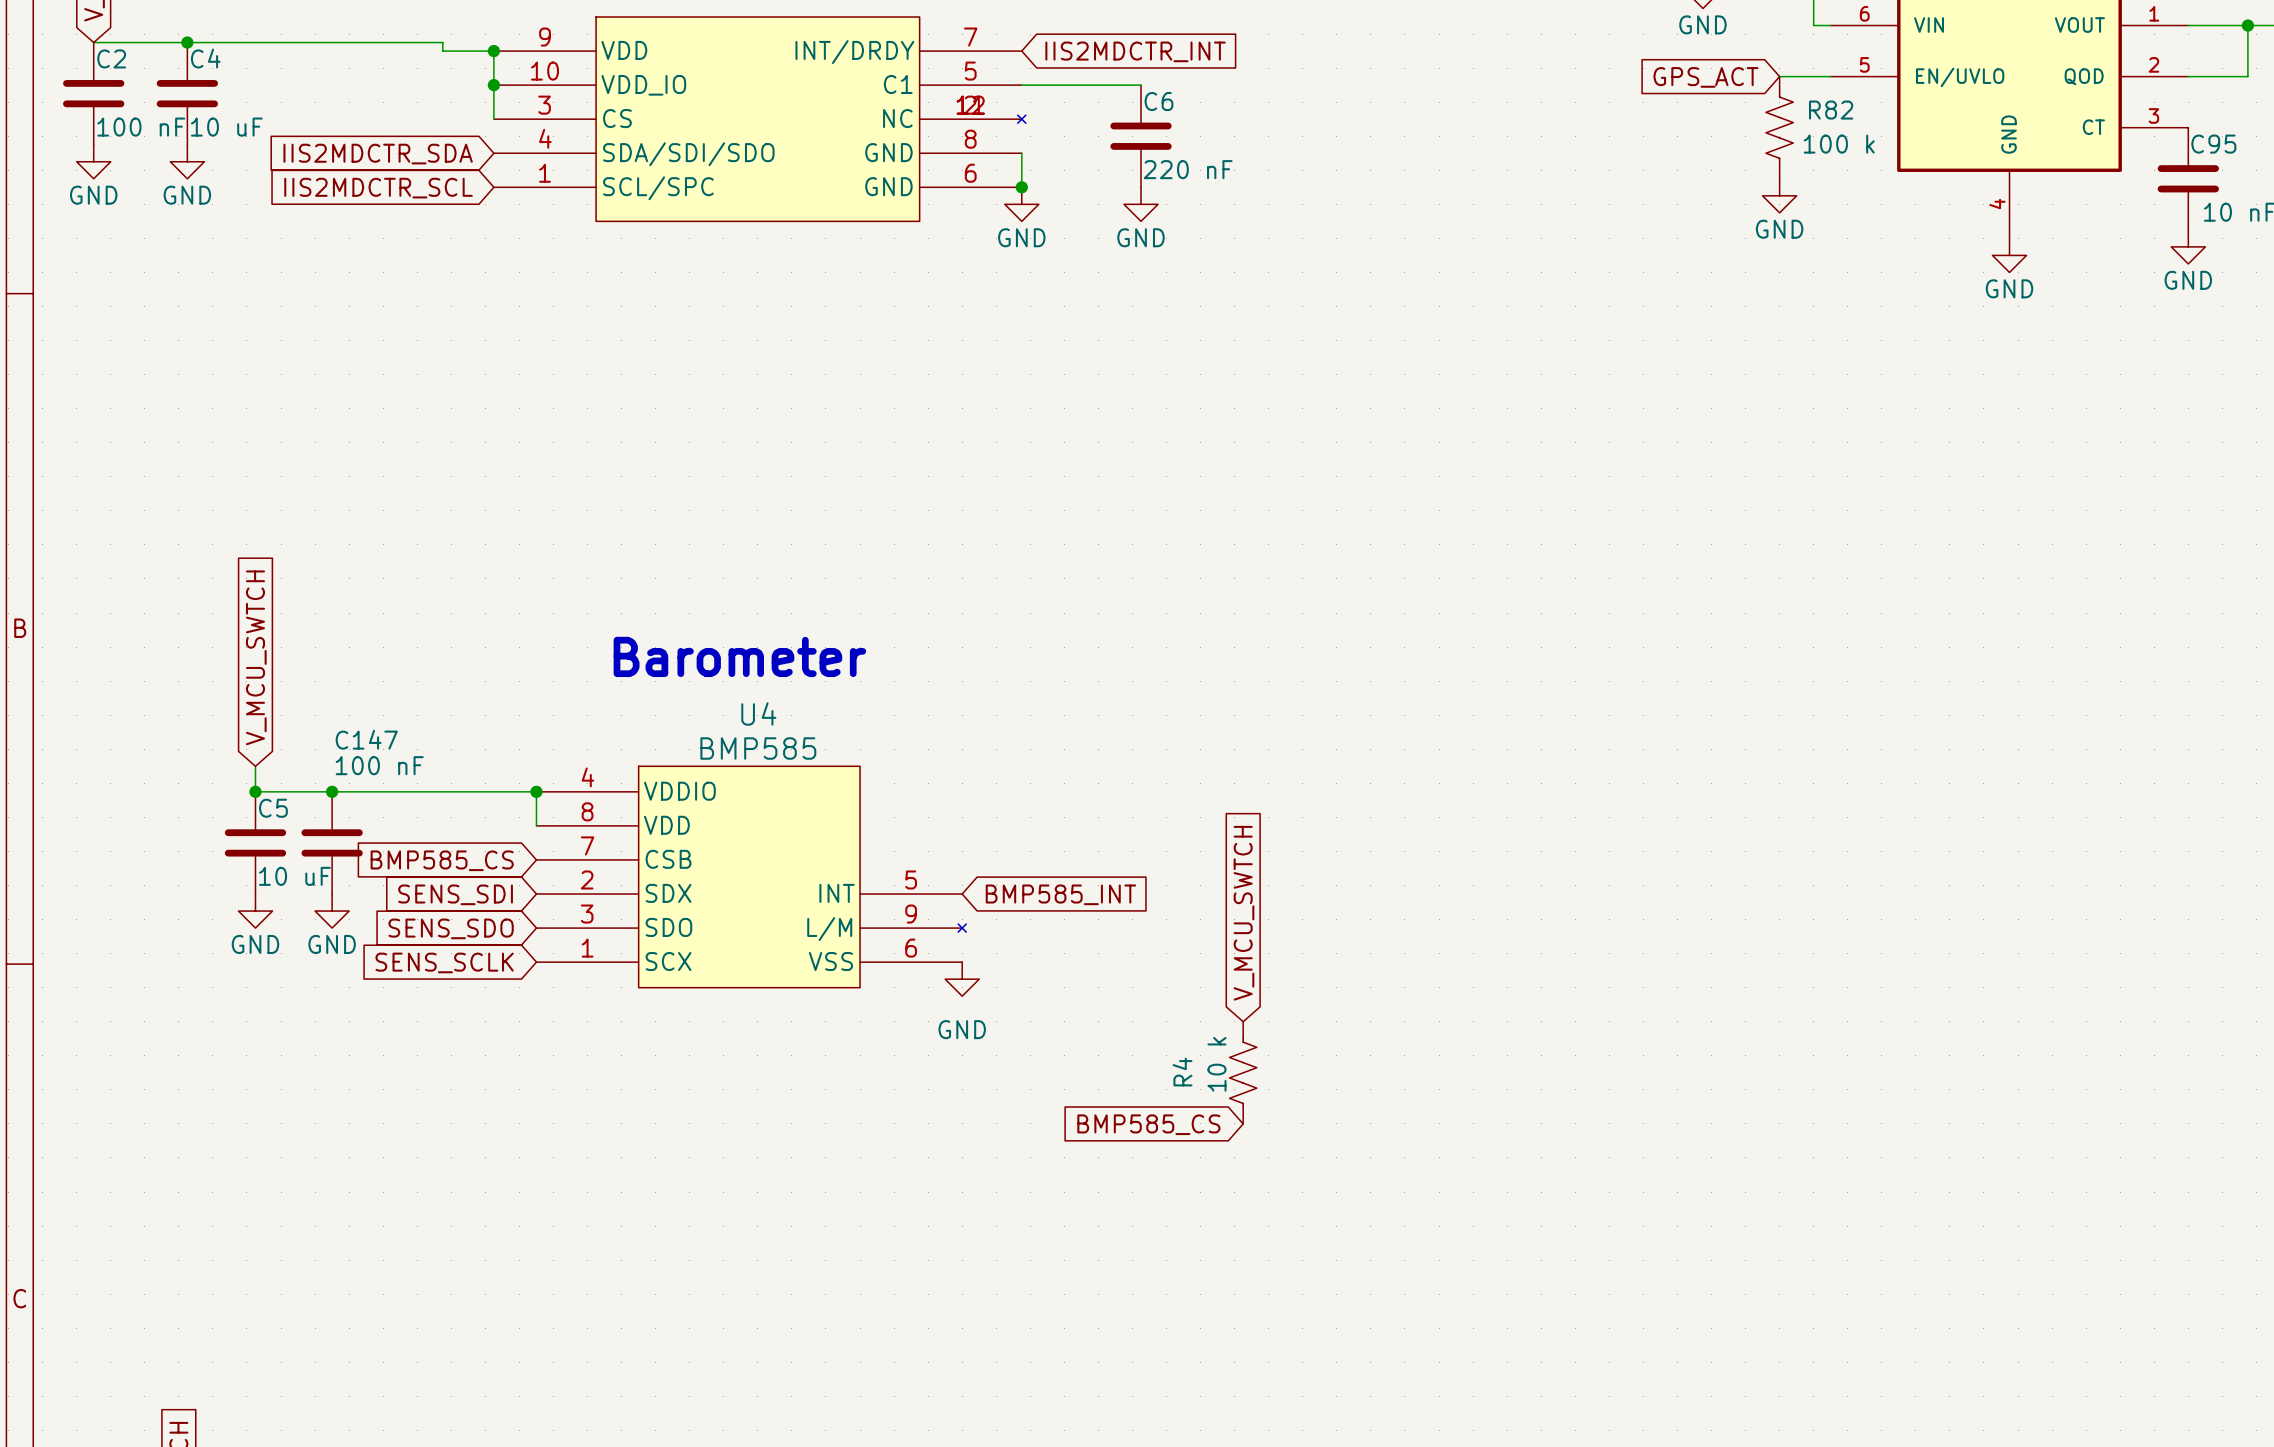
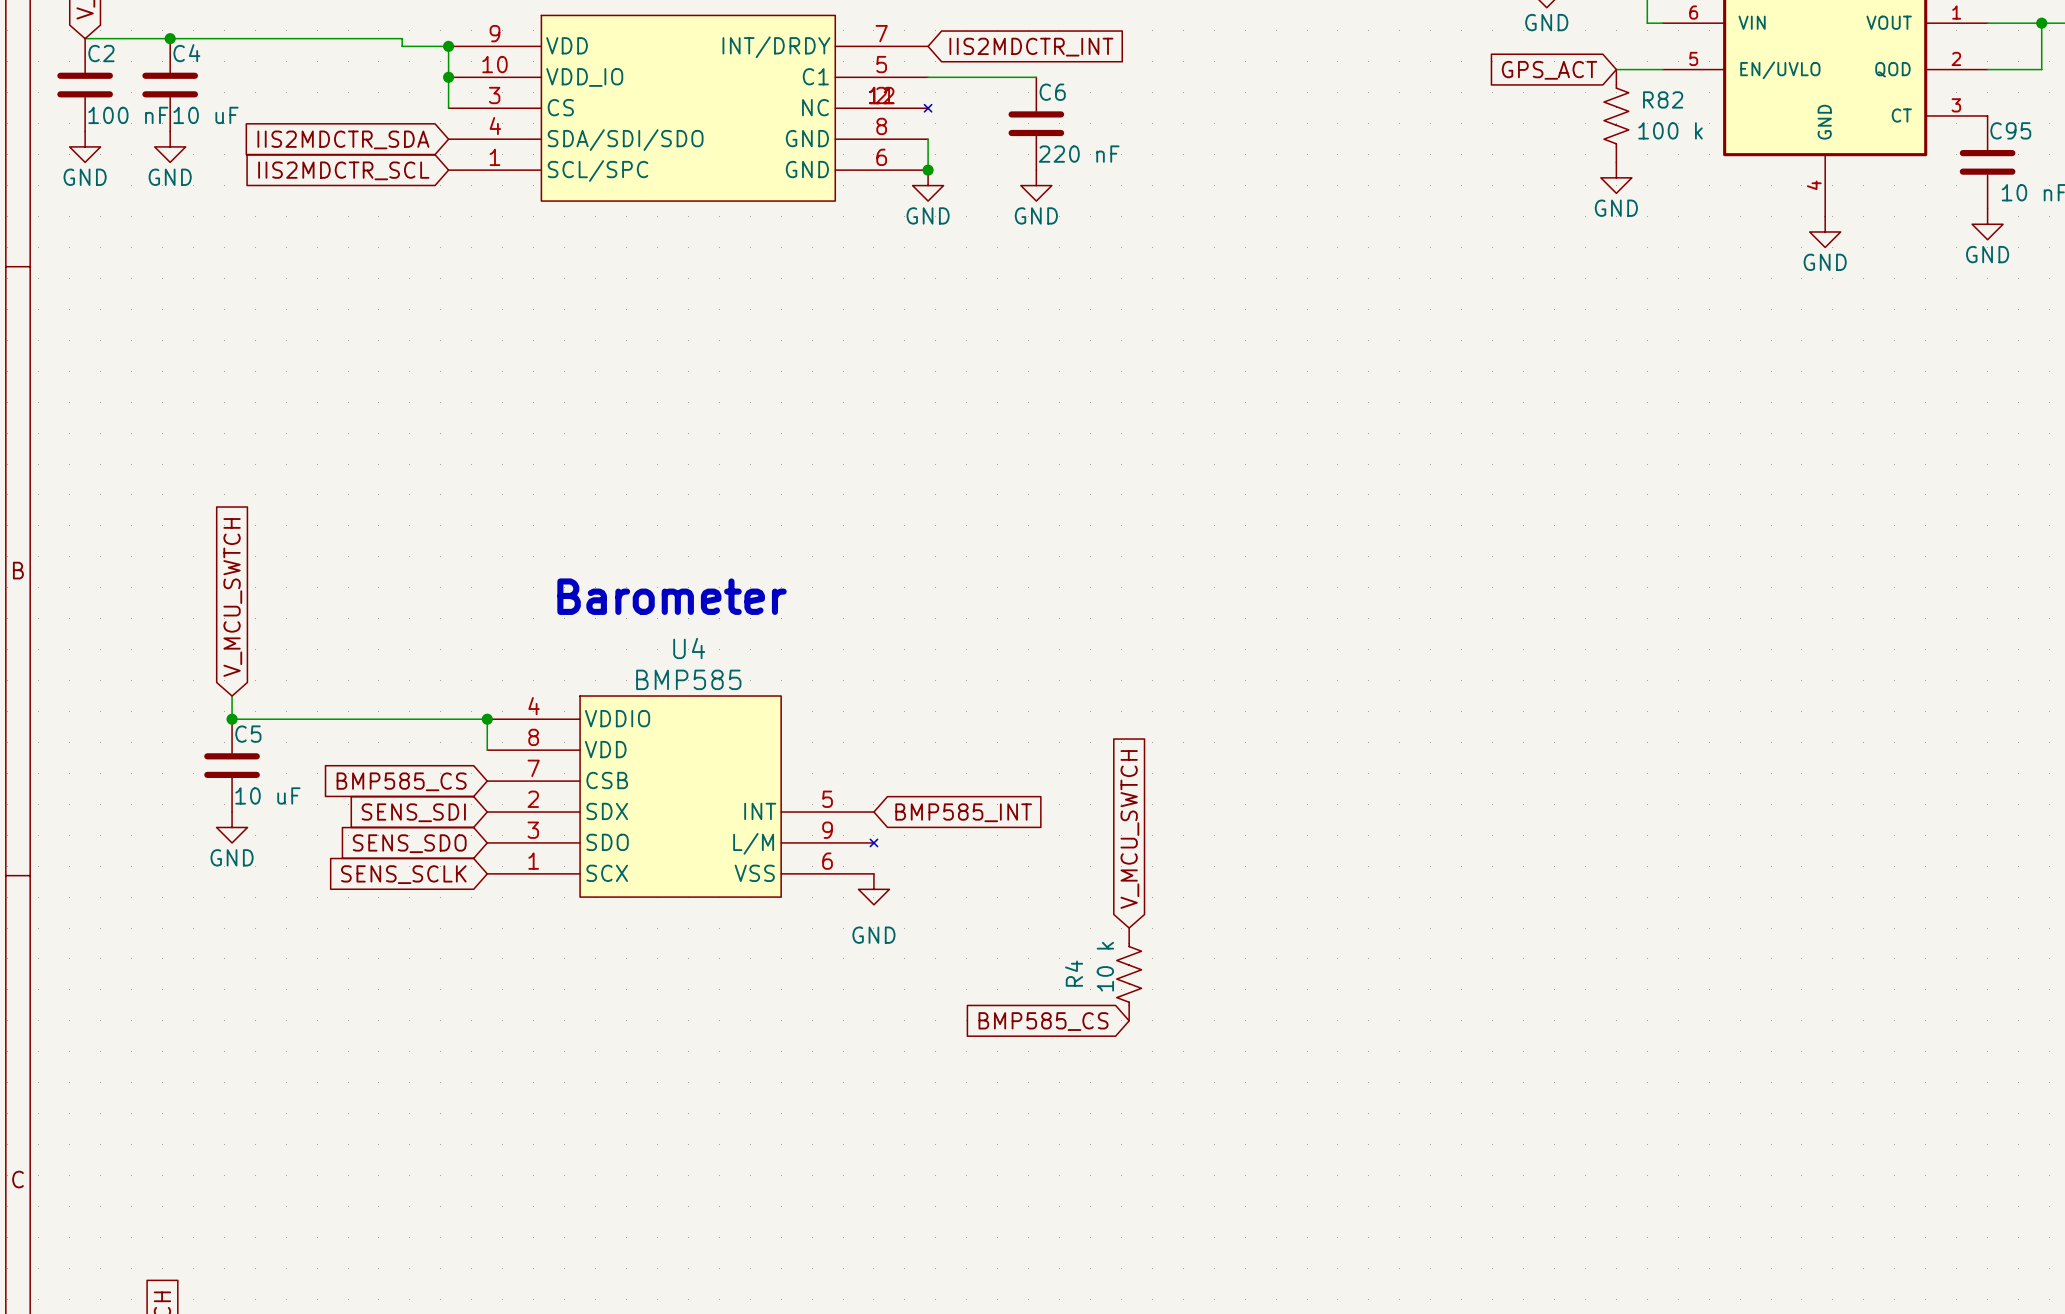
junction: (332, 791) -> none
C147: 100 nF (332, 842) -> none
power symbol: GND (332, 911) -> none

